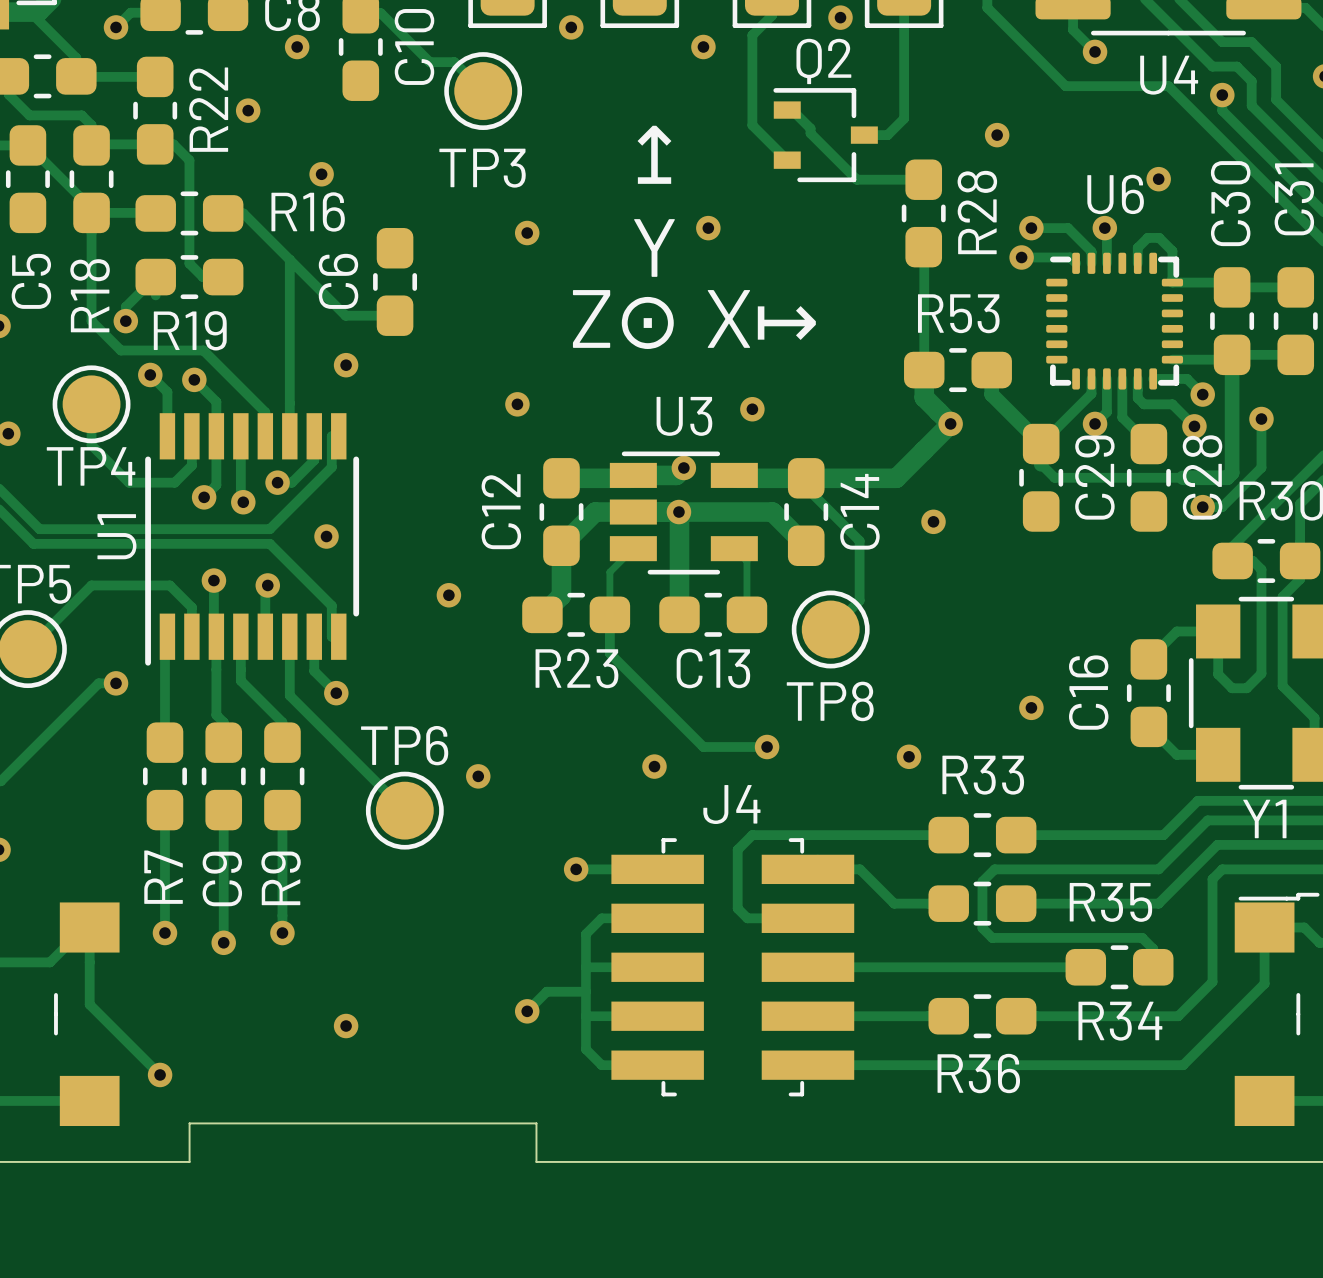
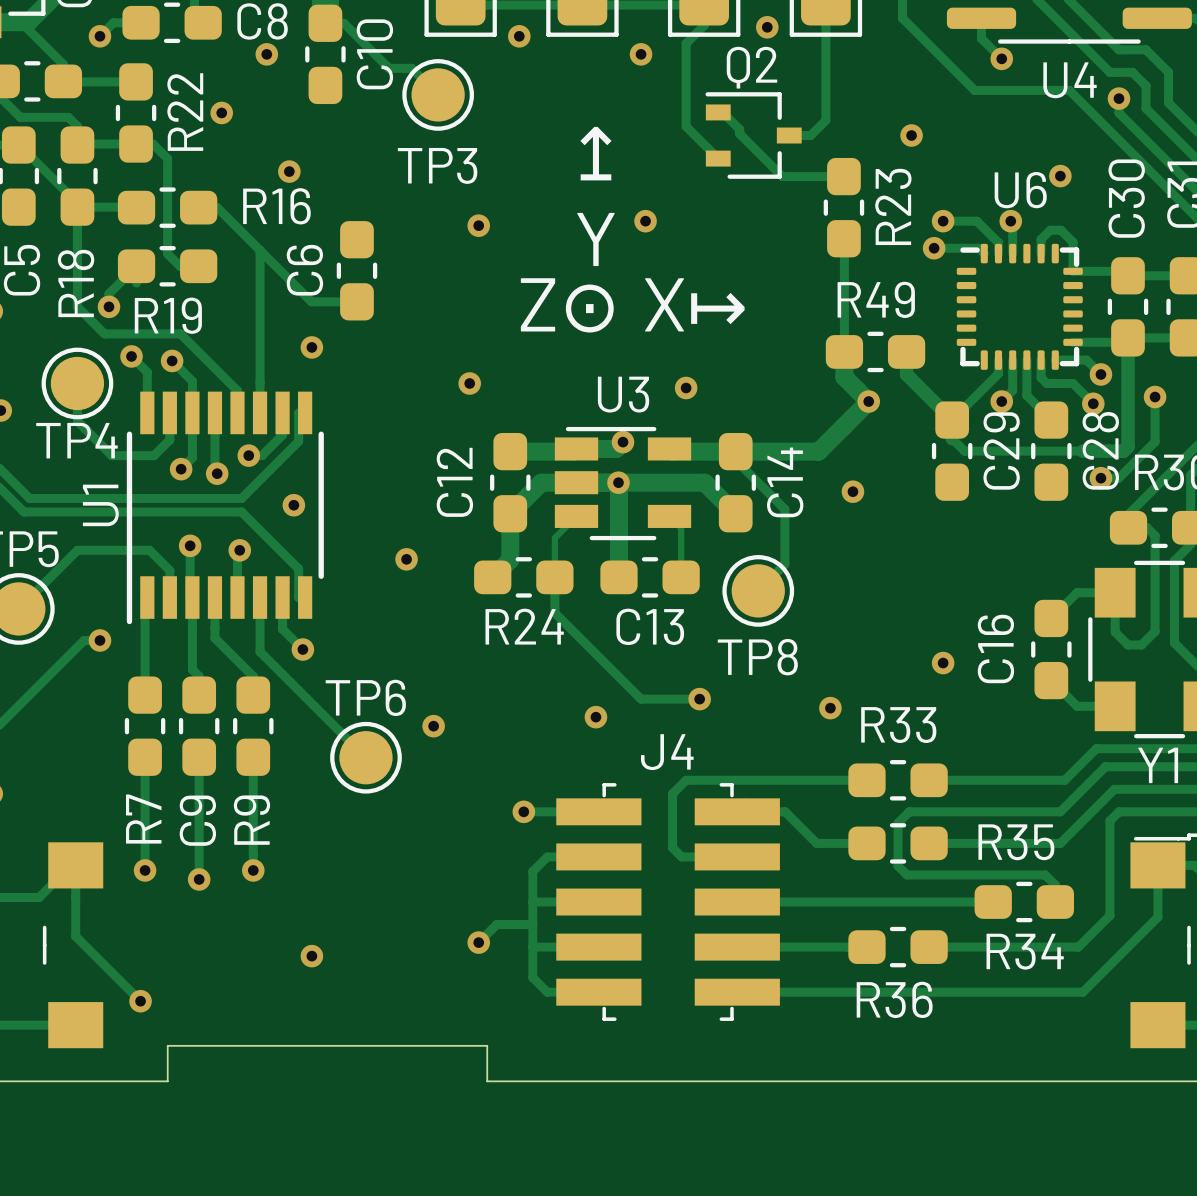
R28 name: R28 (977, 212) -> R23 (893, 206)
R53 name: R53 (958, 313) -> R49 (876, 299)
R23 name: R23 (576, 668) -> R24 (524, 626)

